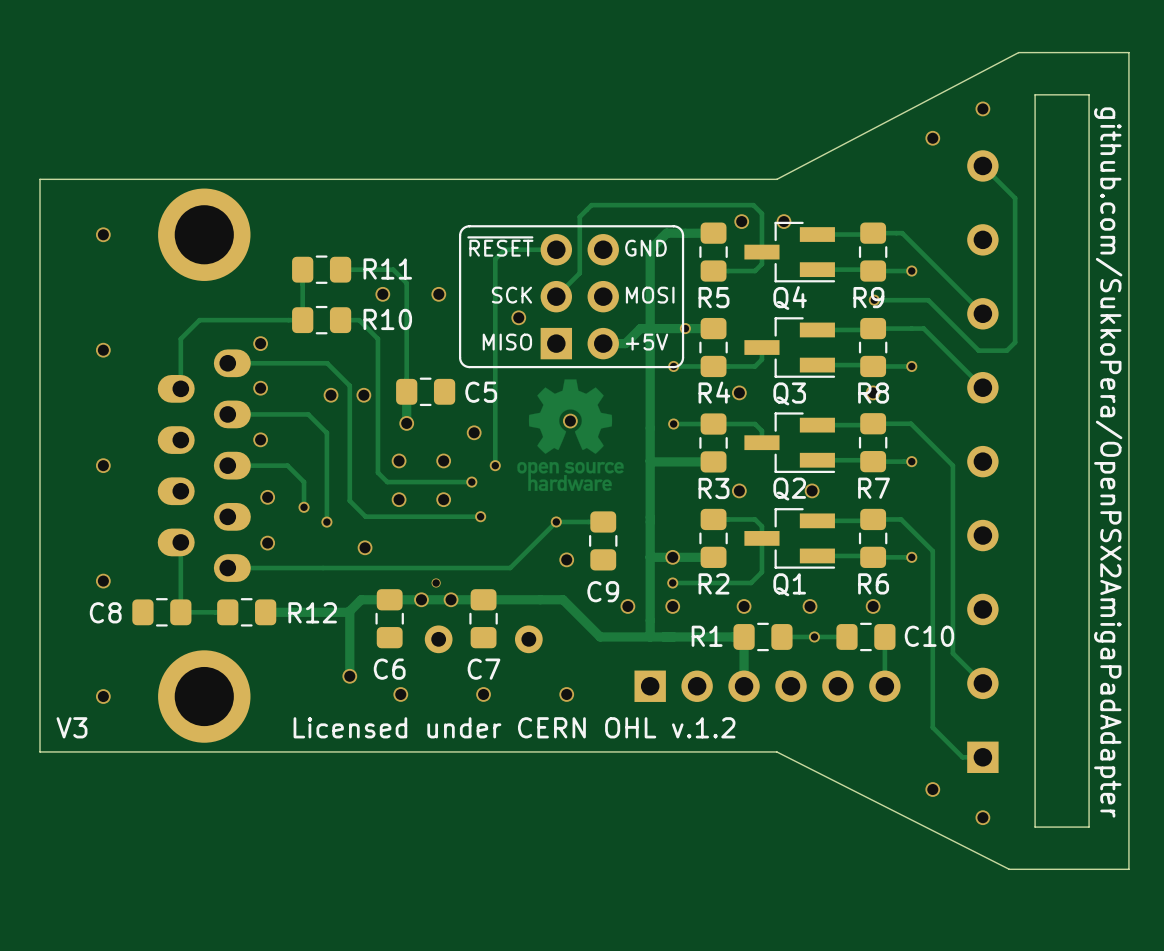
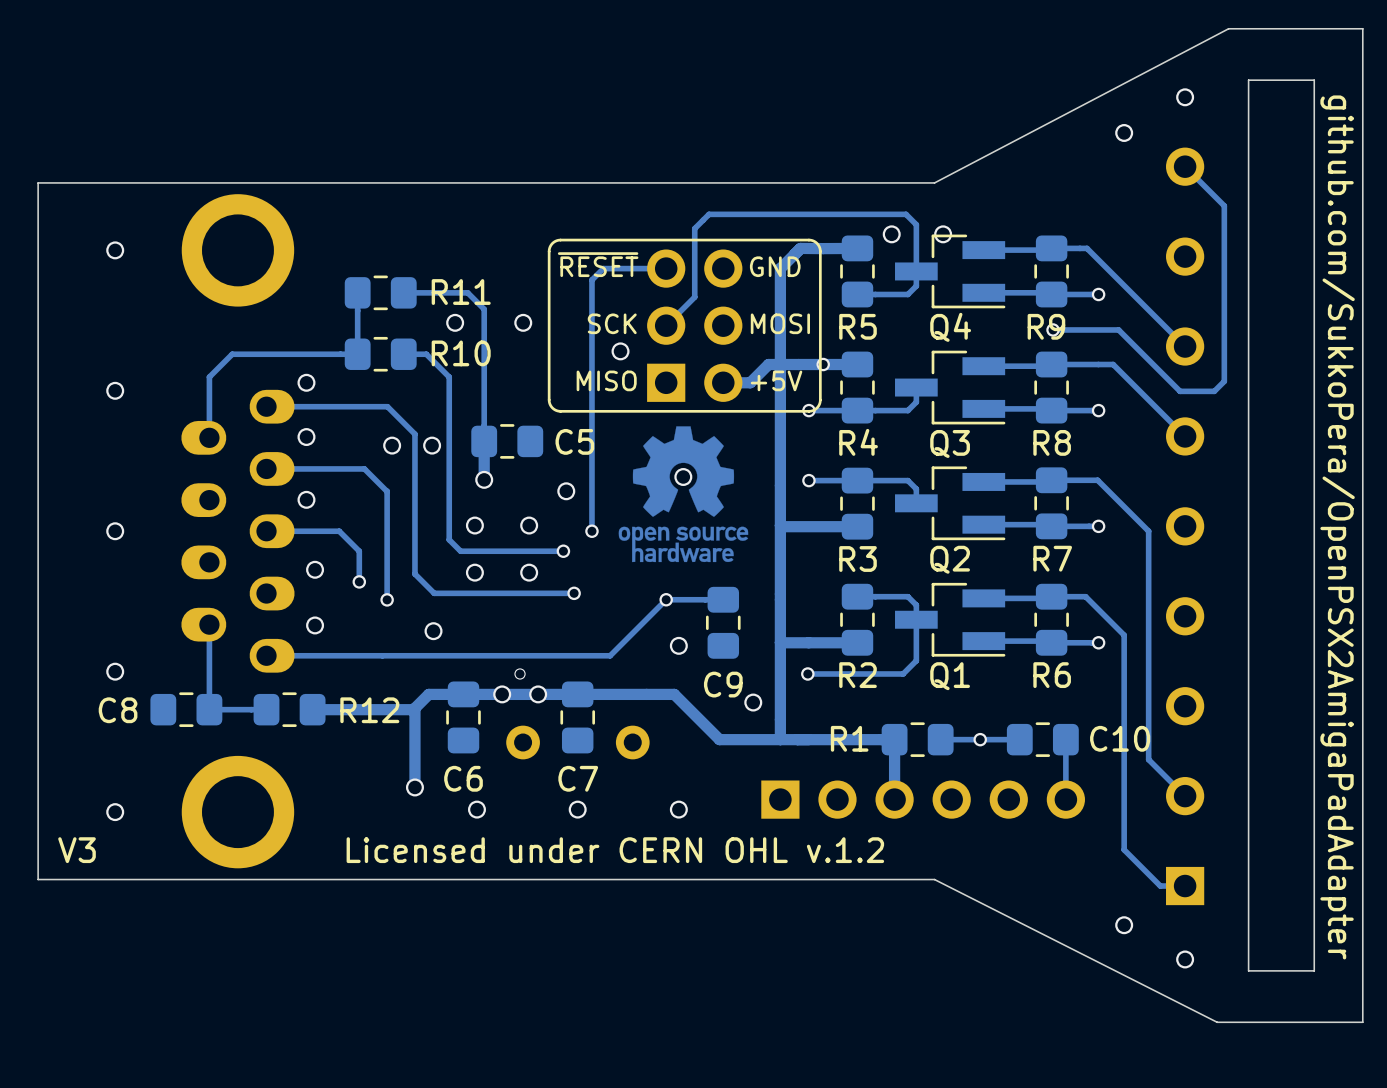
via: (739, 392) -> none
via: (873, 392) -> none
via: (739, 490) -> none
via: (812, 490) -> none
via: (672, 557) -> none
via: (672, 606) -> none
via: (744, 606) -> none
via: (810, 606) -> none
via: (873, 606) -> none

